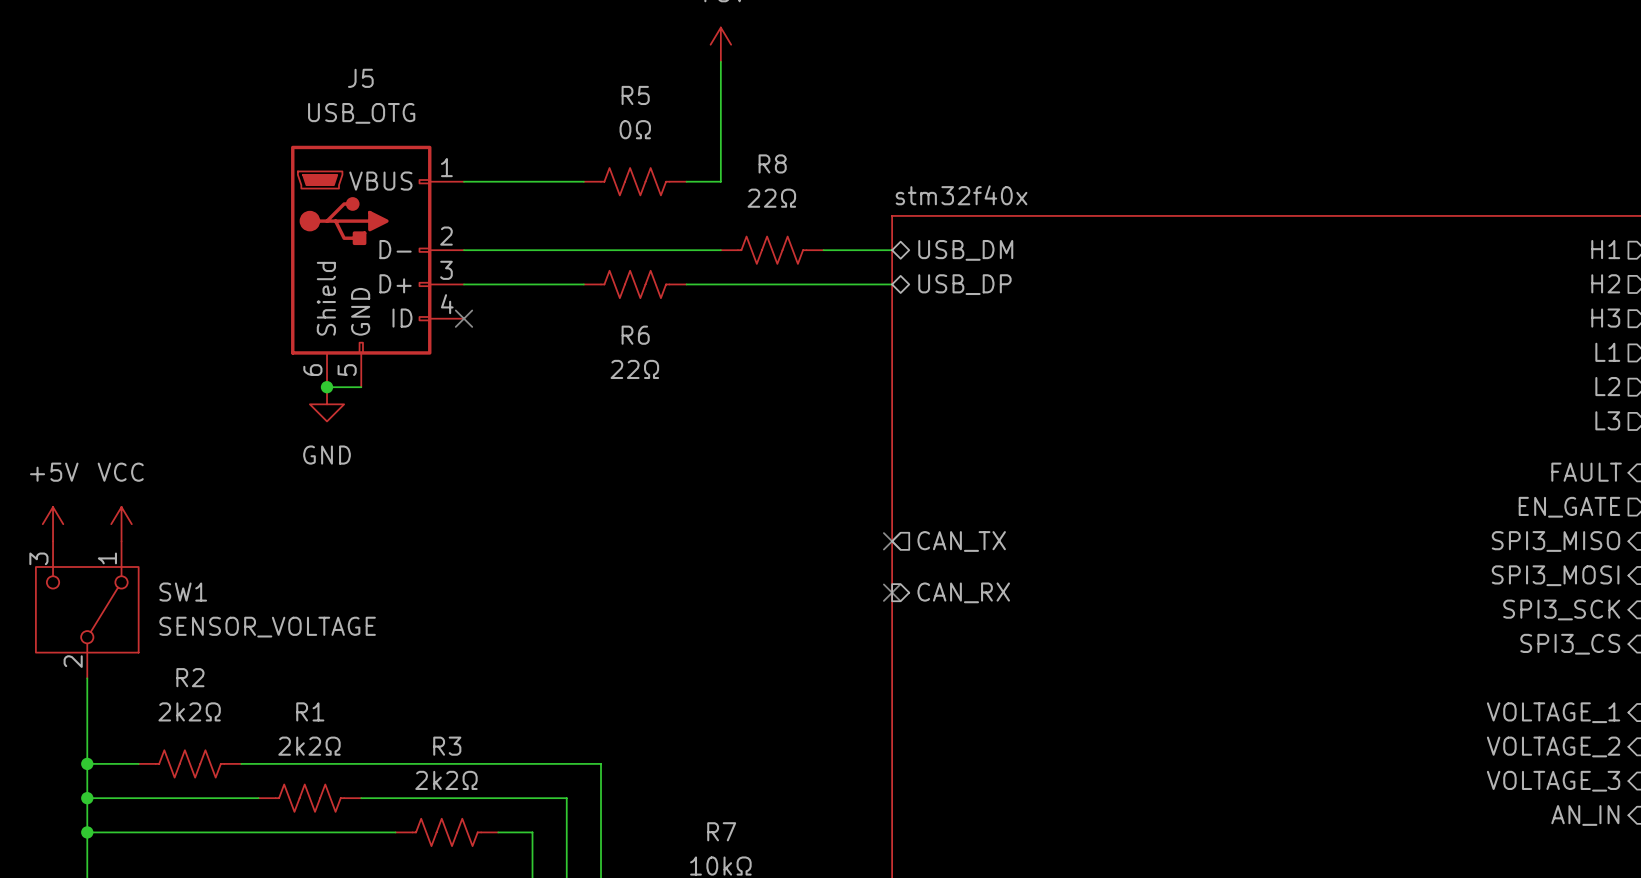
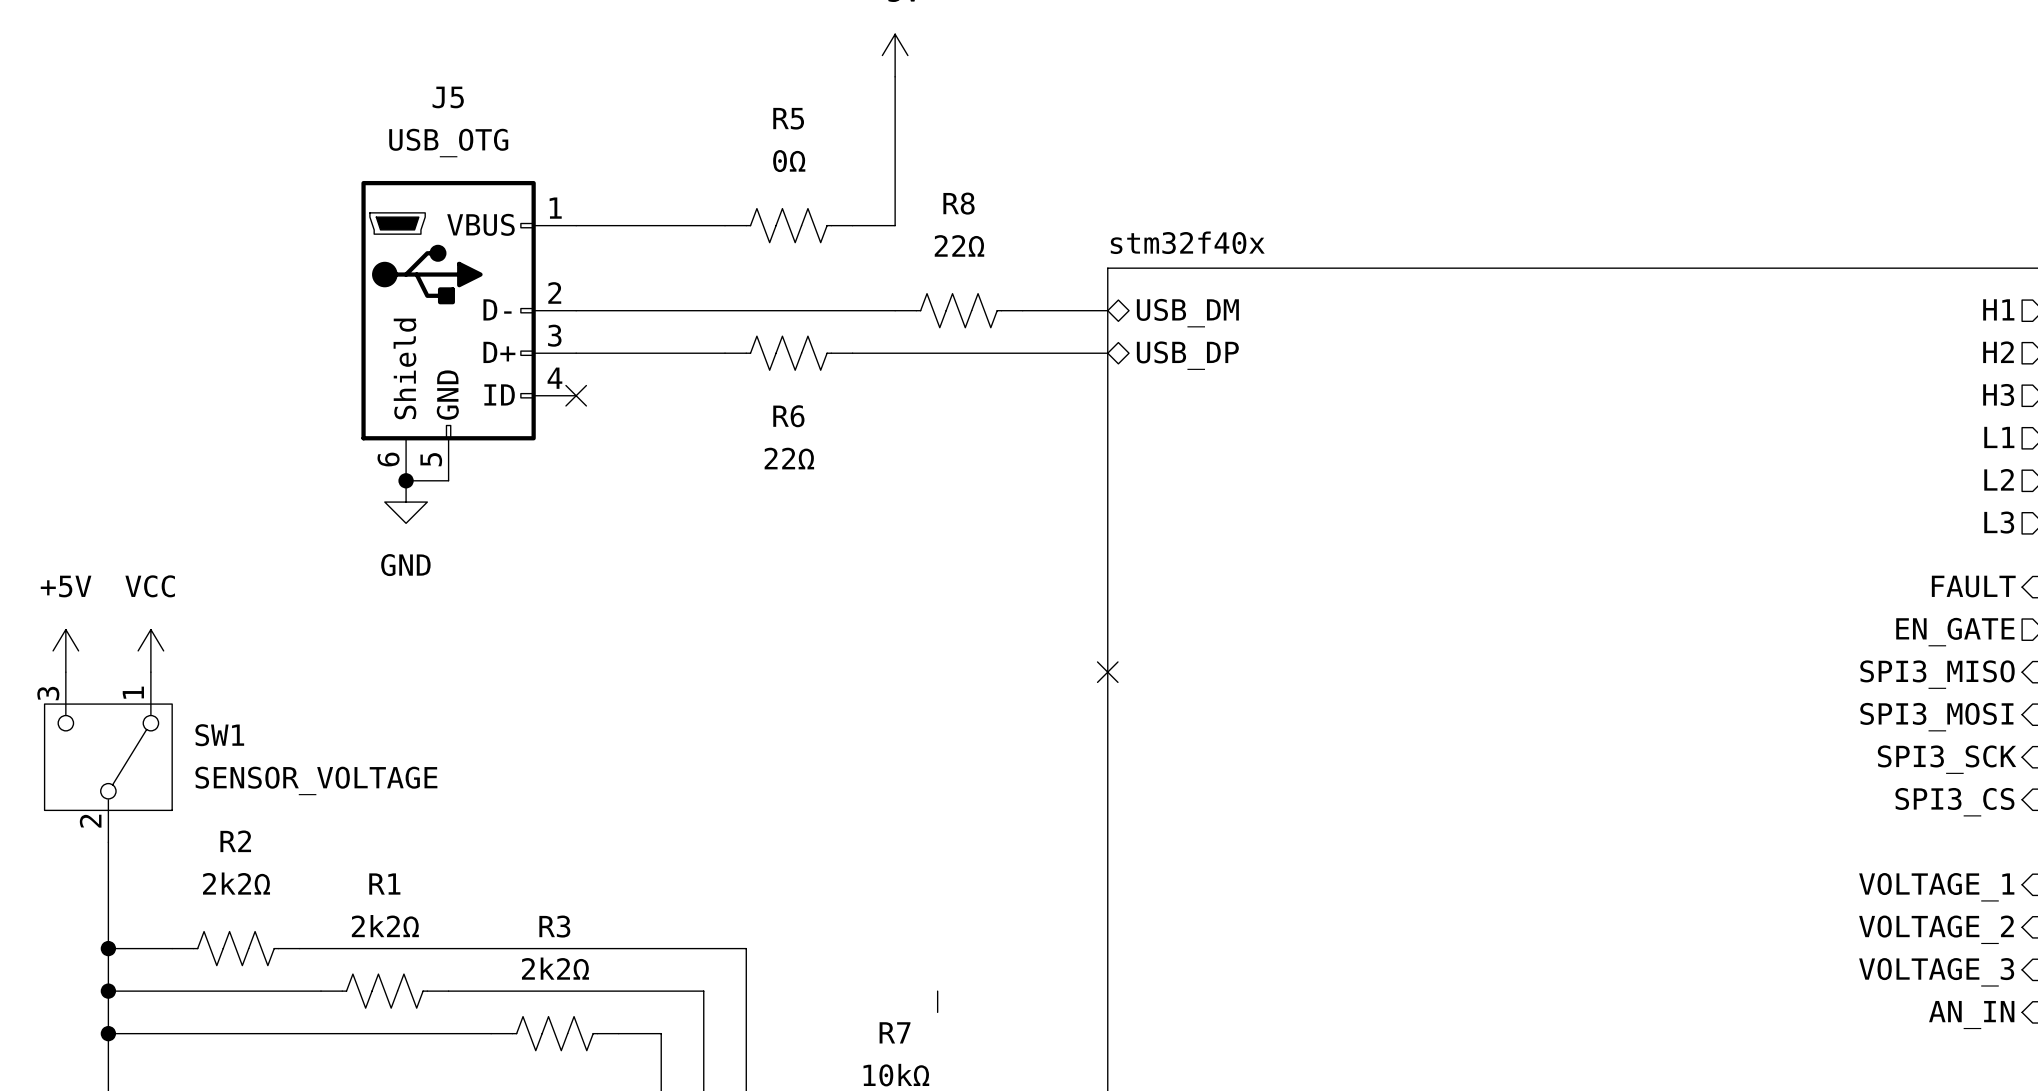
sheet pin: CAN_TX (961, 541) -> none
no-connect mark: (892, 592) -> none
sheet pin: CAN_RX (963, 592) -> none
wire: none -> (937, 991) (937, 1012)

